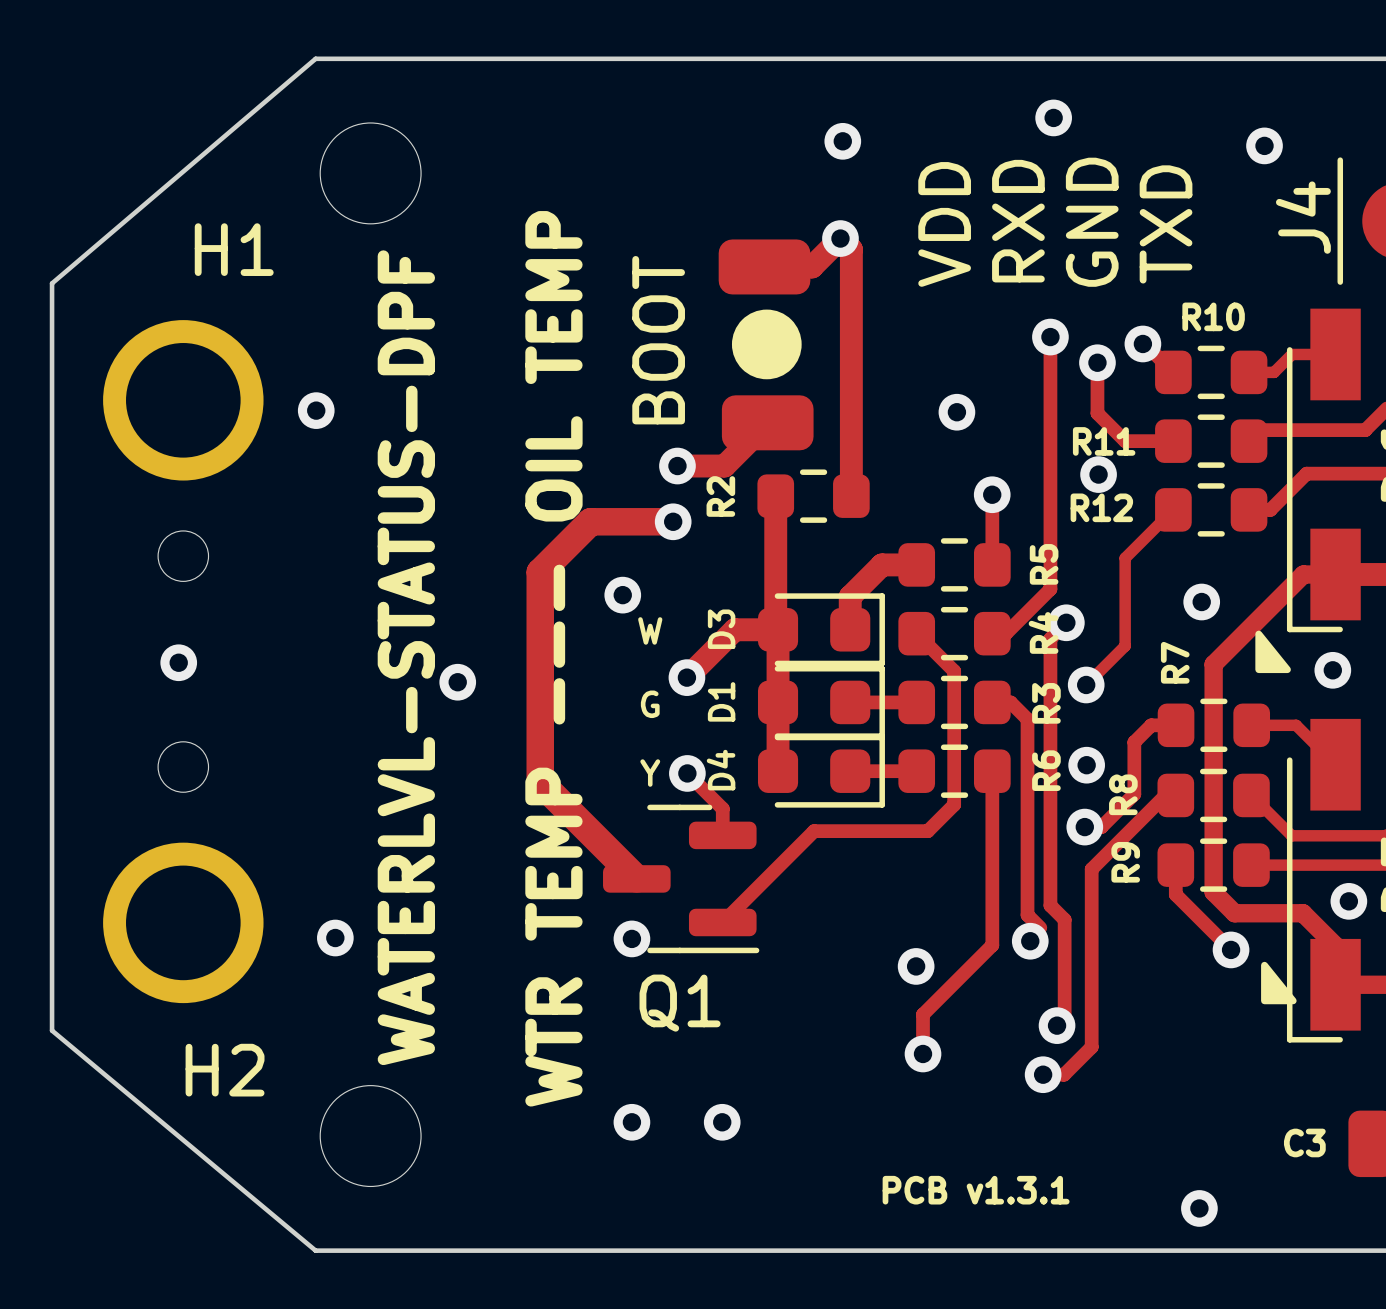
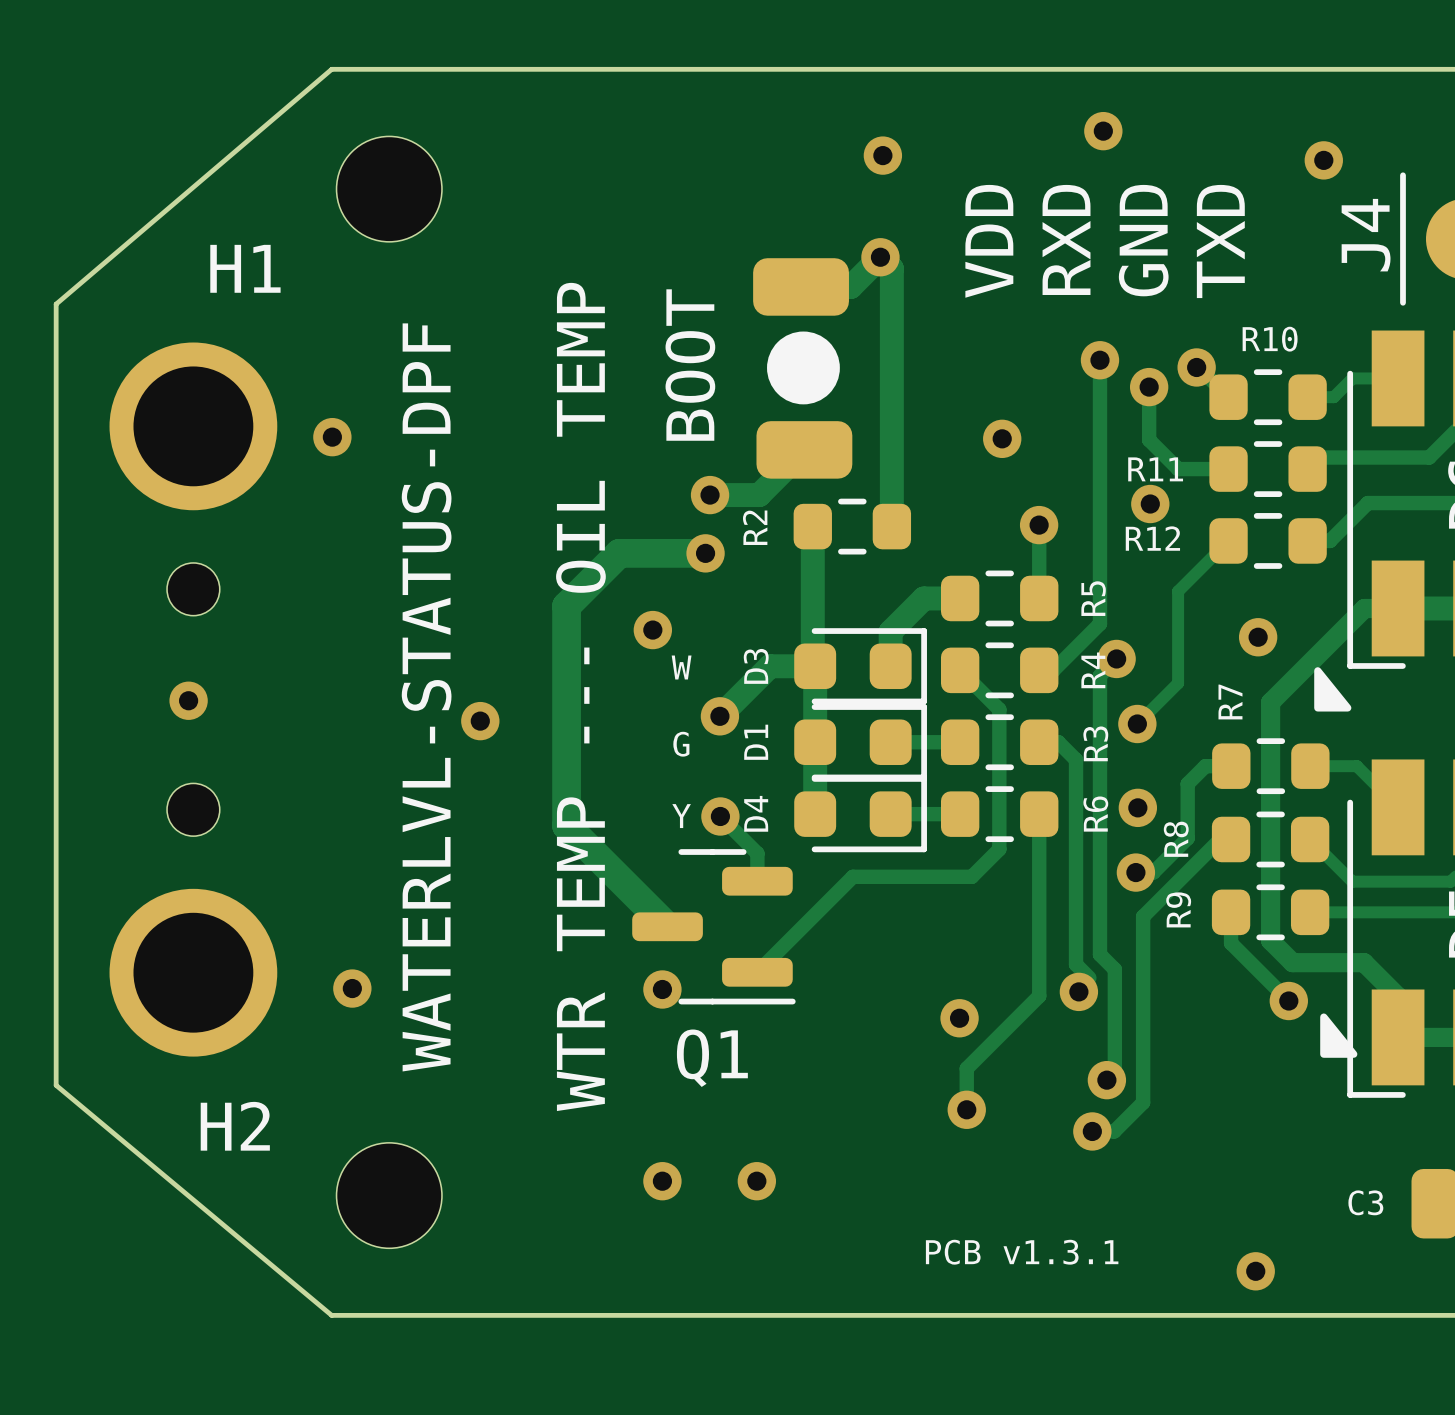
via: (1332, 670) -> none
via: (1348, 901) -> none

